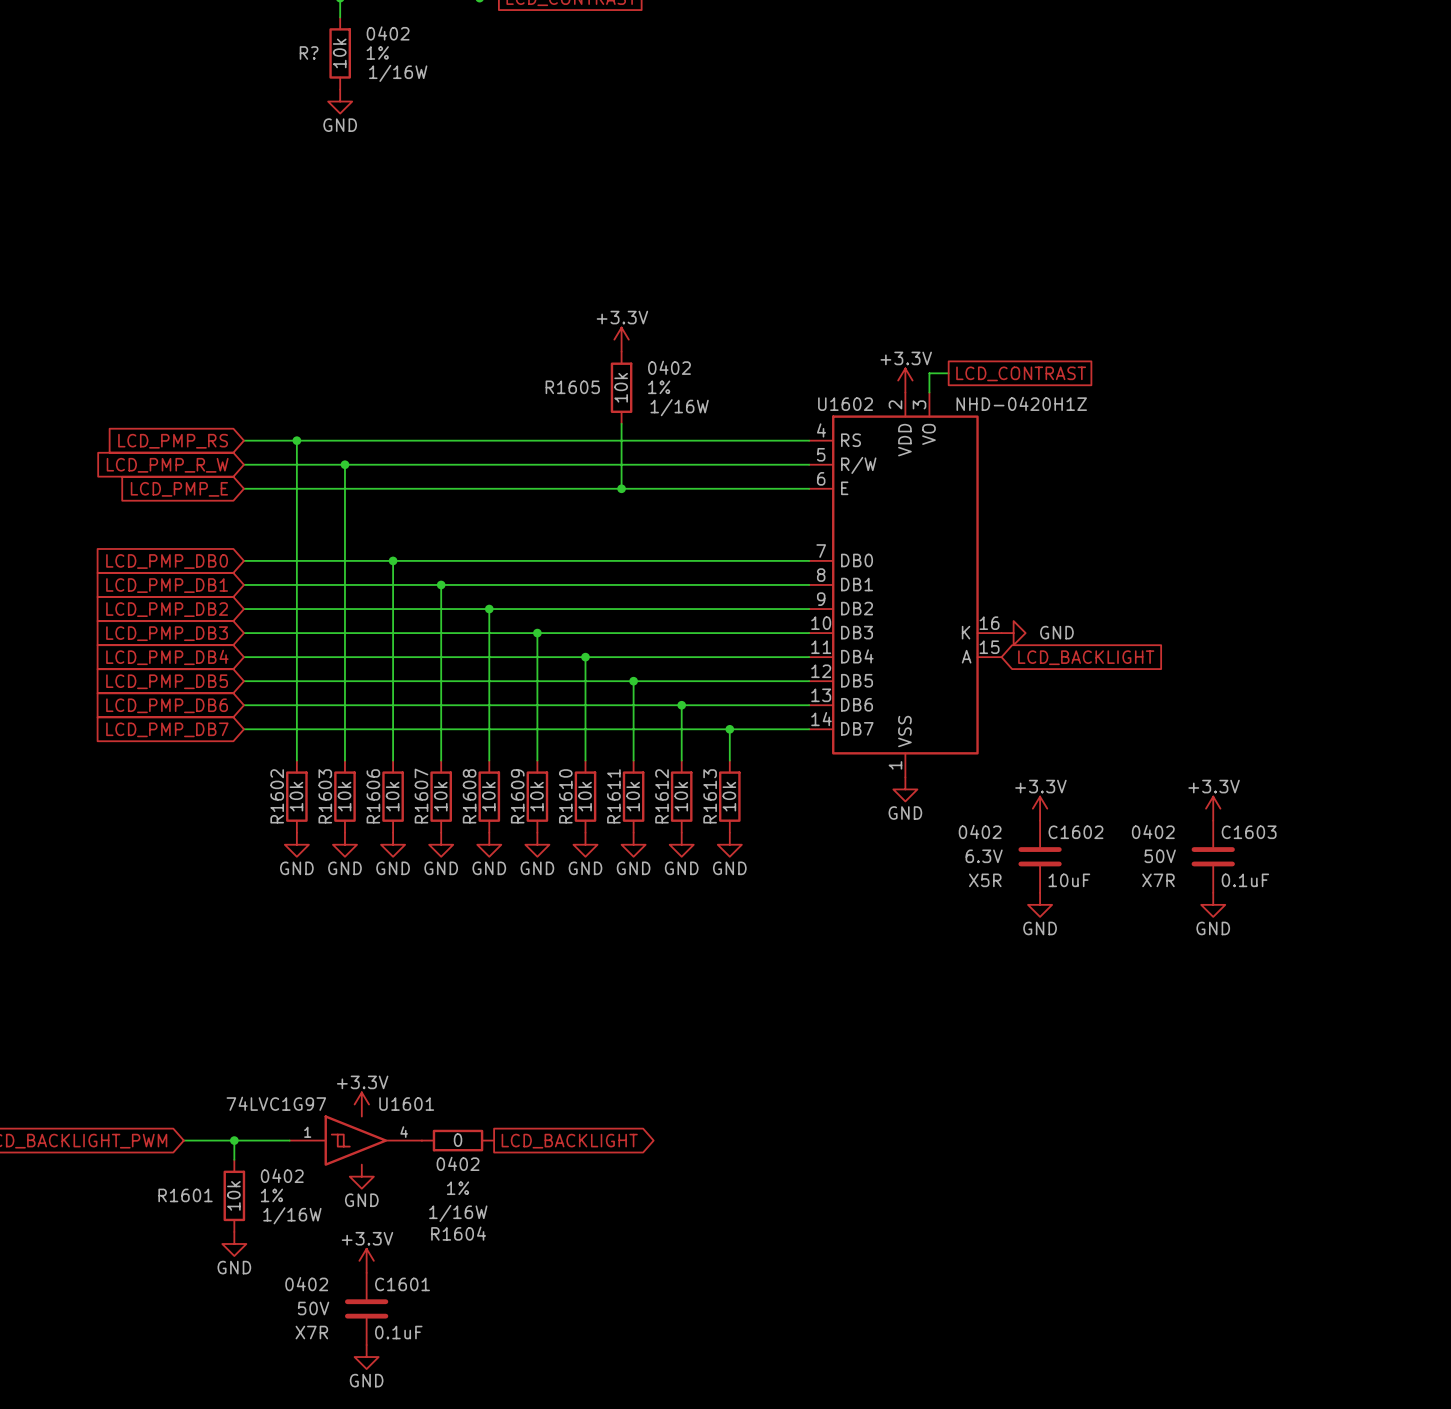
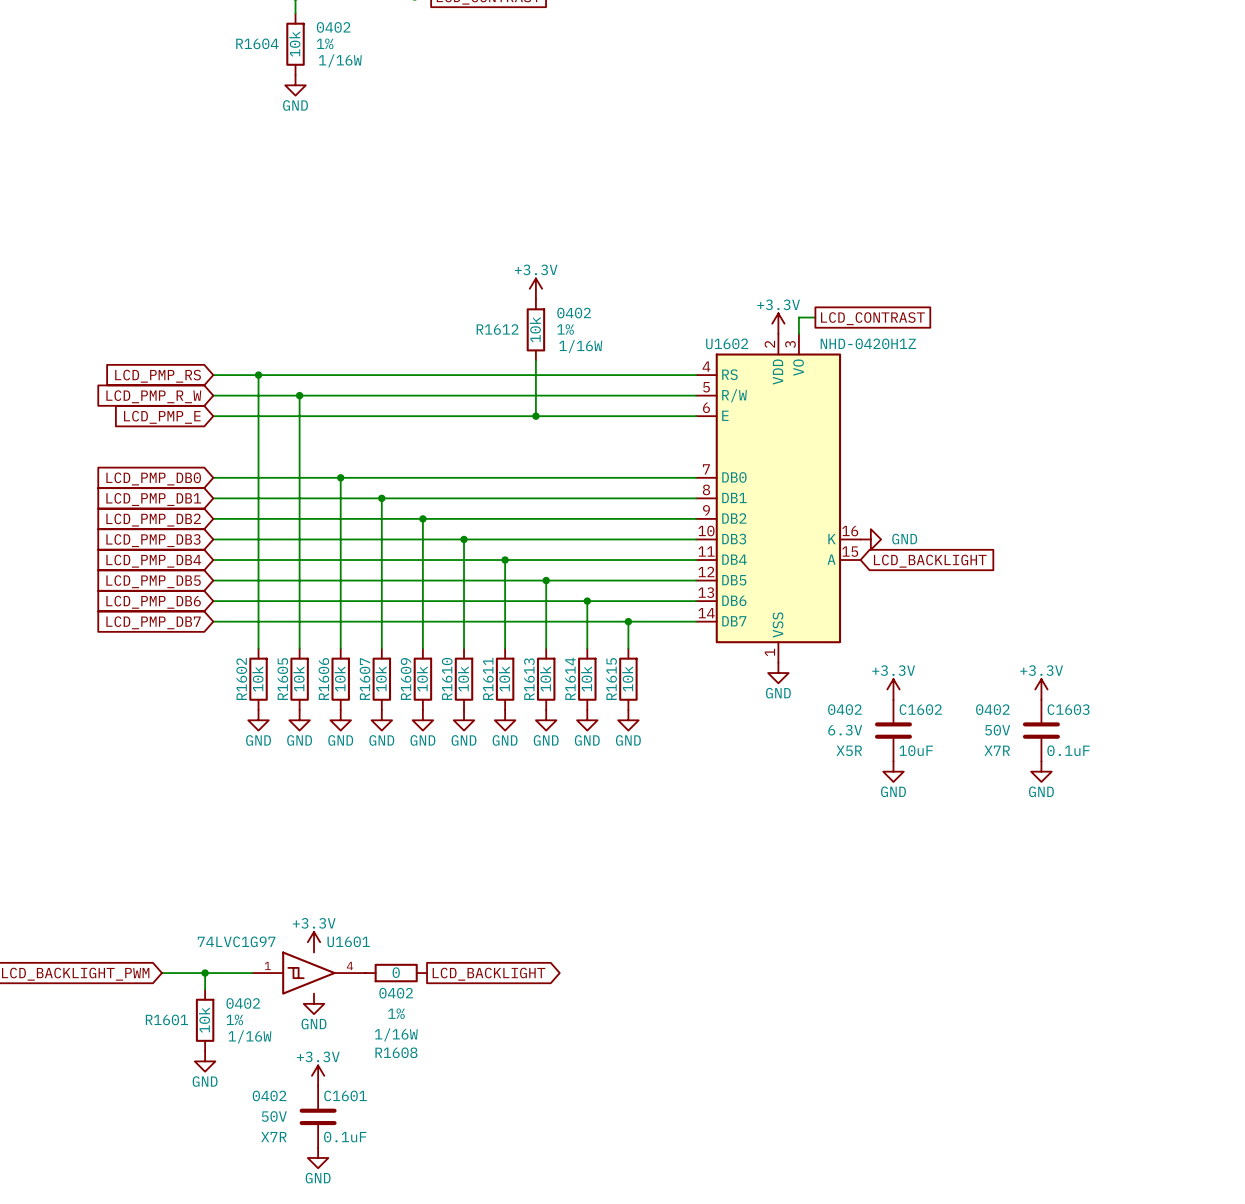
R? name: R? (309, 52) -> R1604 (257, 43)
R1605 name: R1605 (572, 387) -> R1612 (497, 329)
R1603 name: R1603 (325, 796) -> R1605 (282, 679)
R1608 name: R1608 (469, 796) -> R1609 (406, 679)
R1609 name: R1609 (517, 796) -> R1610 (447, 678)
R1610 name: R1610 (565, 796) -> R1611 (488, 678)
R1611 name: R1611 (613, 796) -> R1613 (529, 679)
R1612 name: R1612 (662, 796) -> R1614 (570, 678)
R1613 name: R1613 (710, 796) -> R1615 (611, 679)
R1604 name: R1604 (458, 1233) -> R1608 (396, 1052)

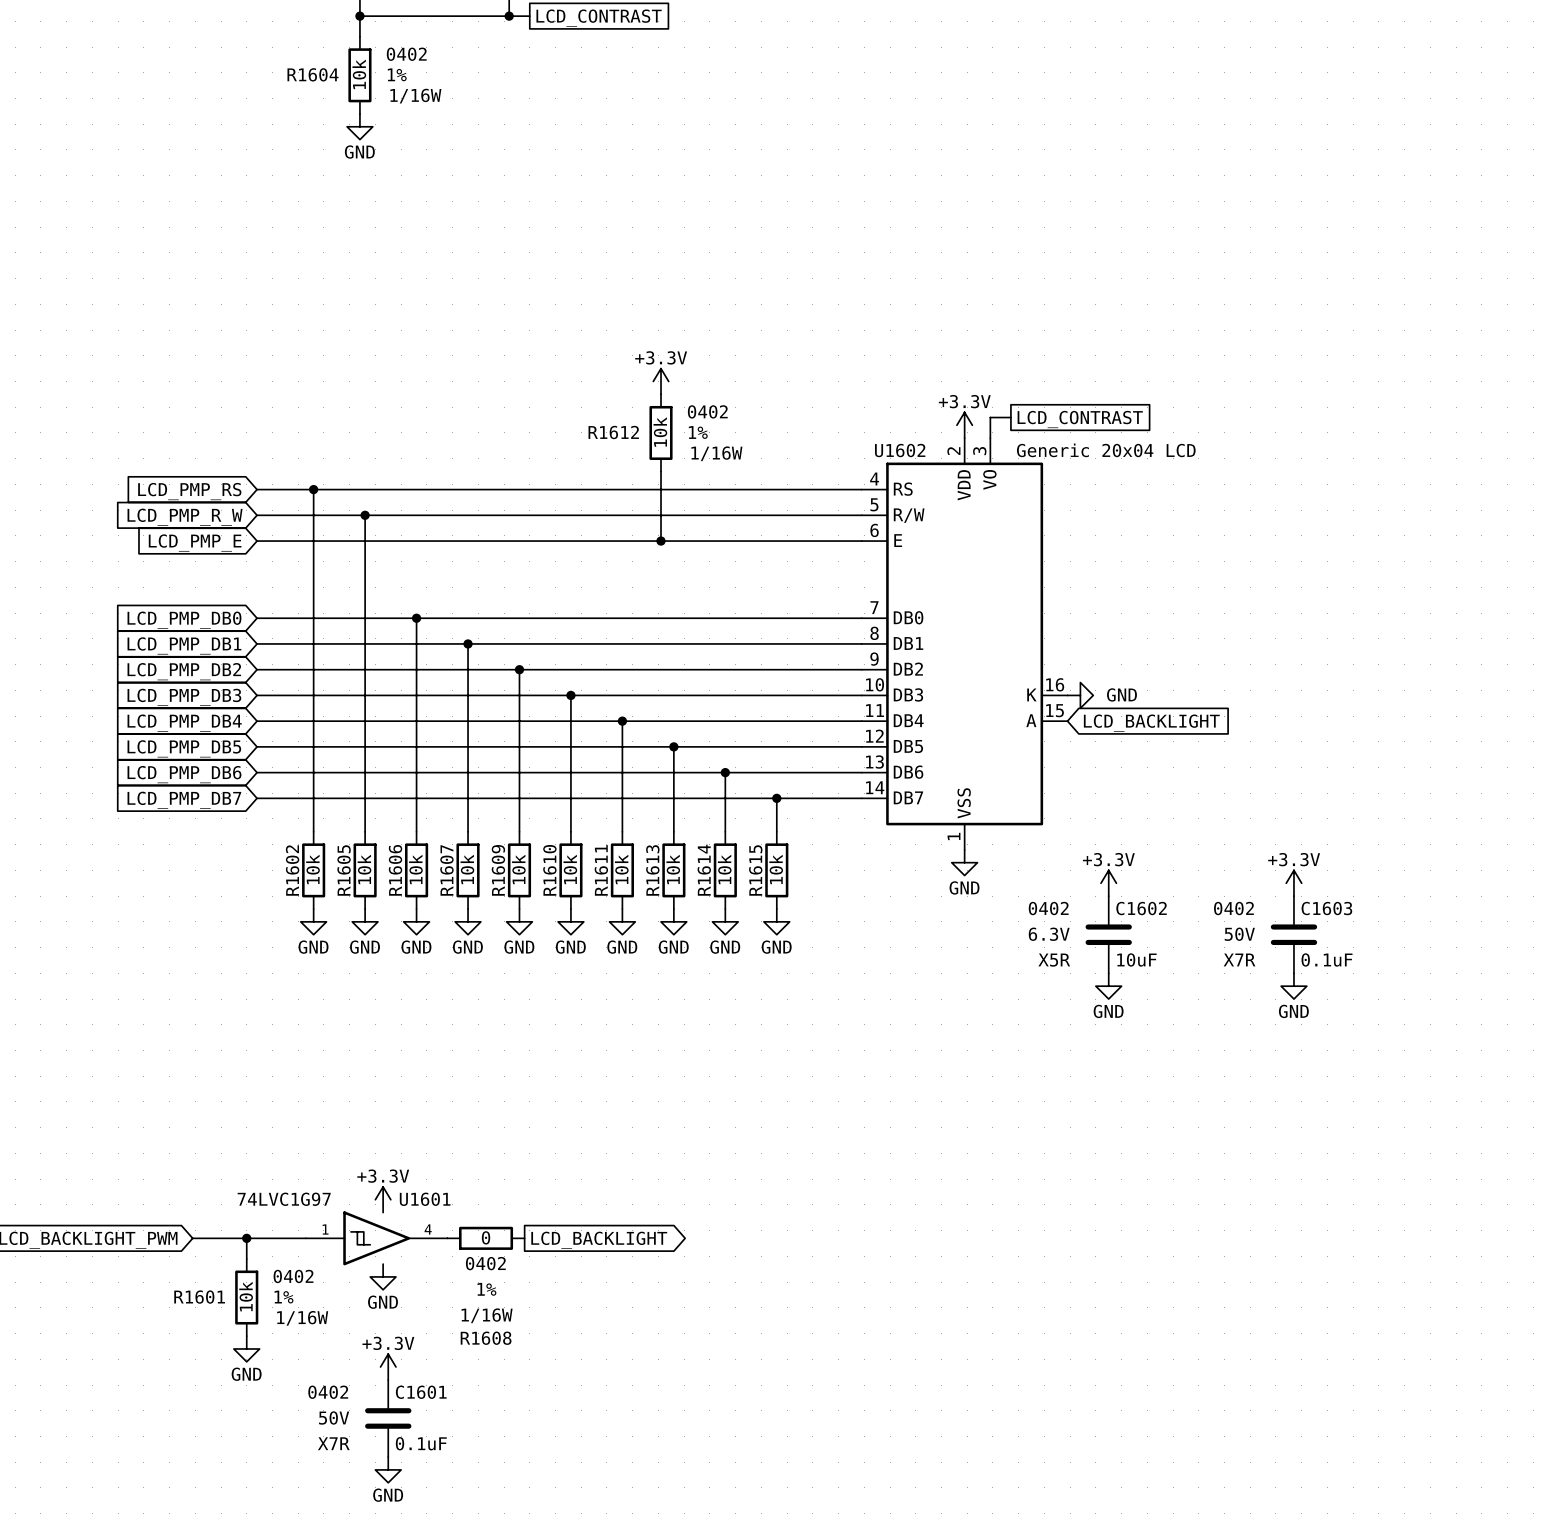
U1602 value: NHD-0420H1Z (868, 343) -> Generic 20x04 LCD (1106, 450)

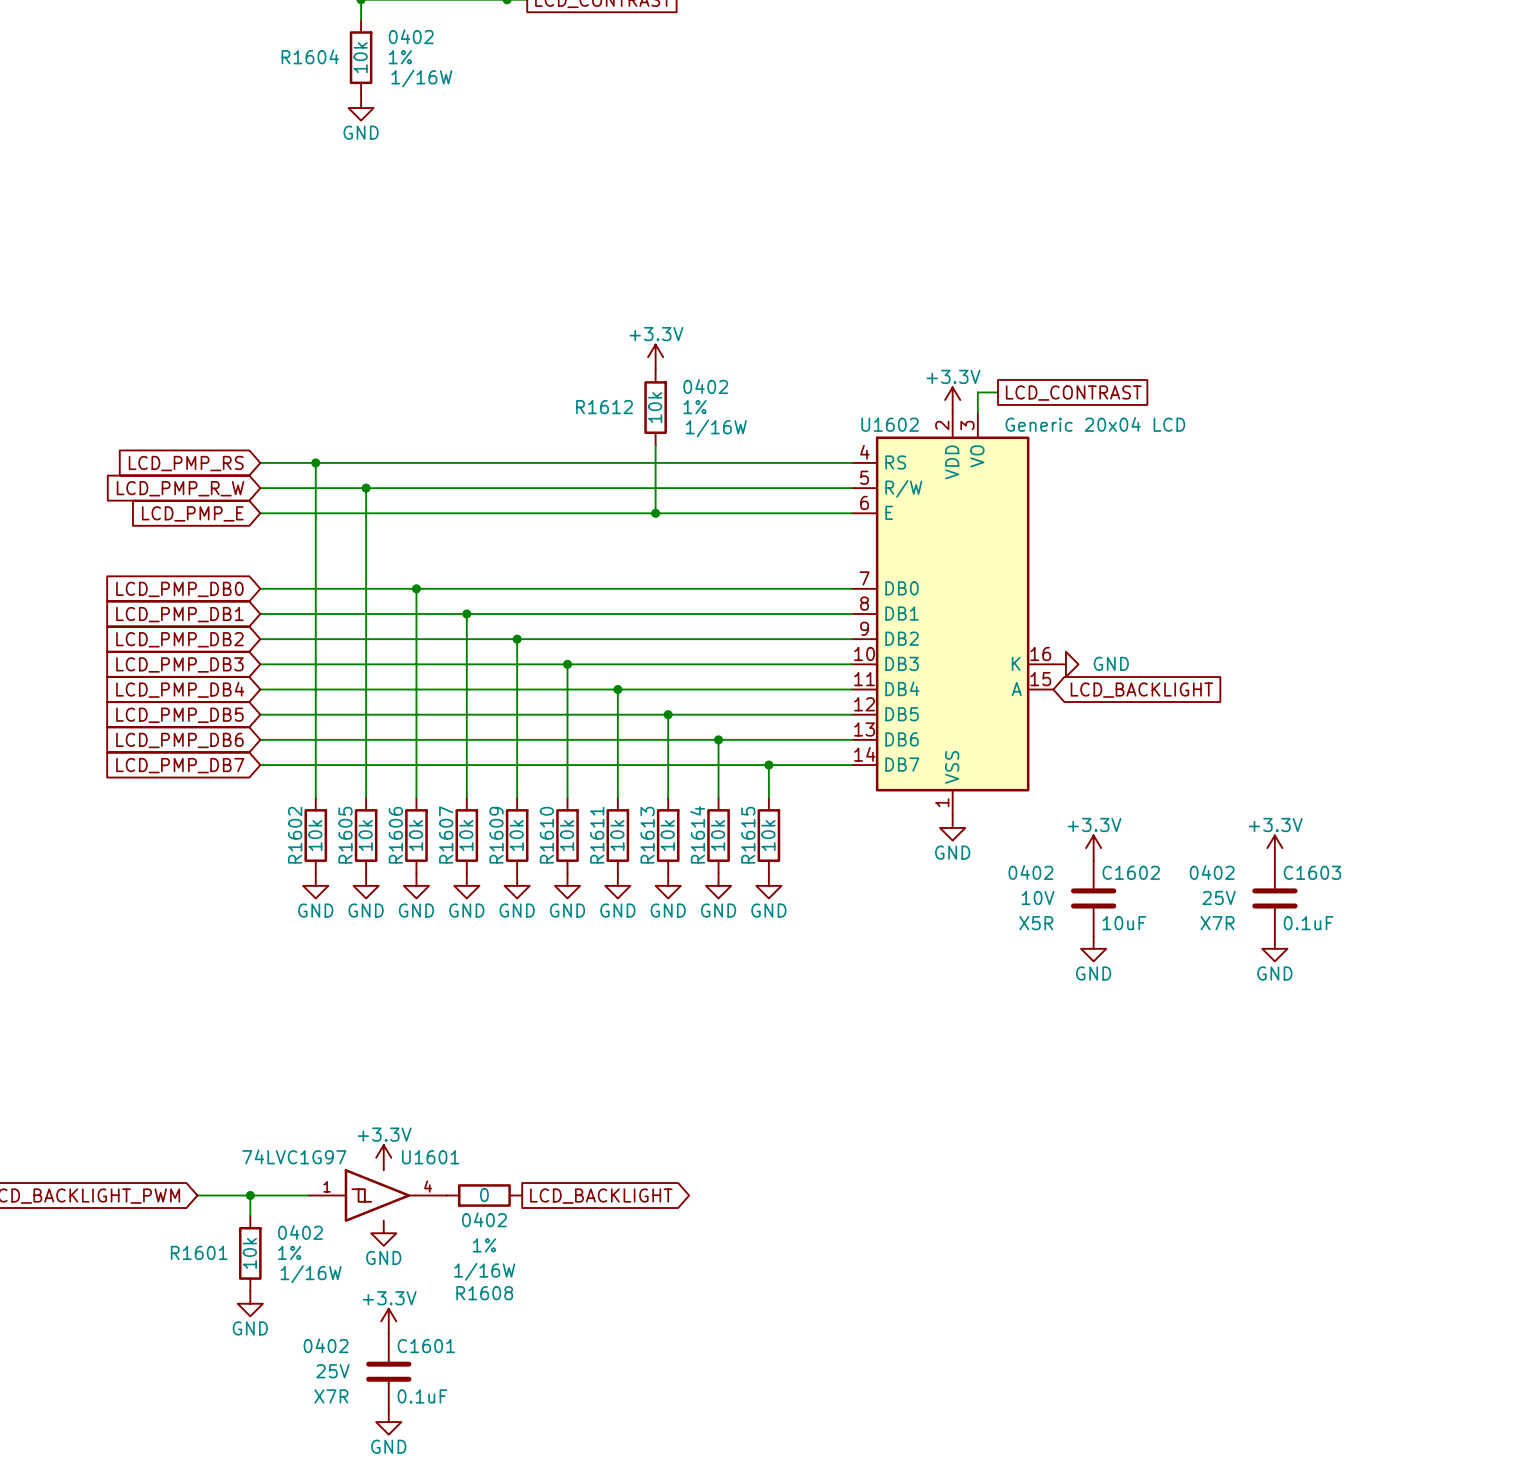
C1602 text: 6.3V (1049, 934) -> 10V (1038, 897)
C1603 text: 50V (1239, 934) -> 25V (1219, 897)
C1601 text: 50V (334, 1417) -> 25V (332, 1371)

